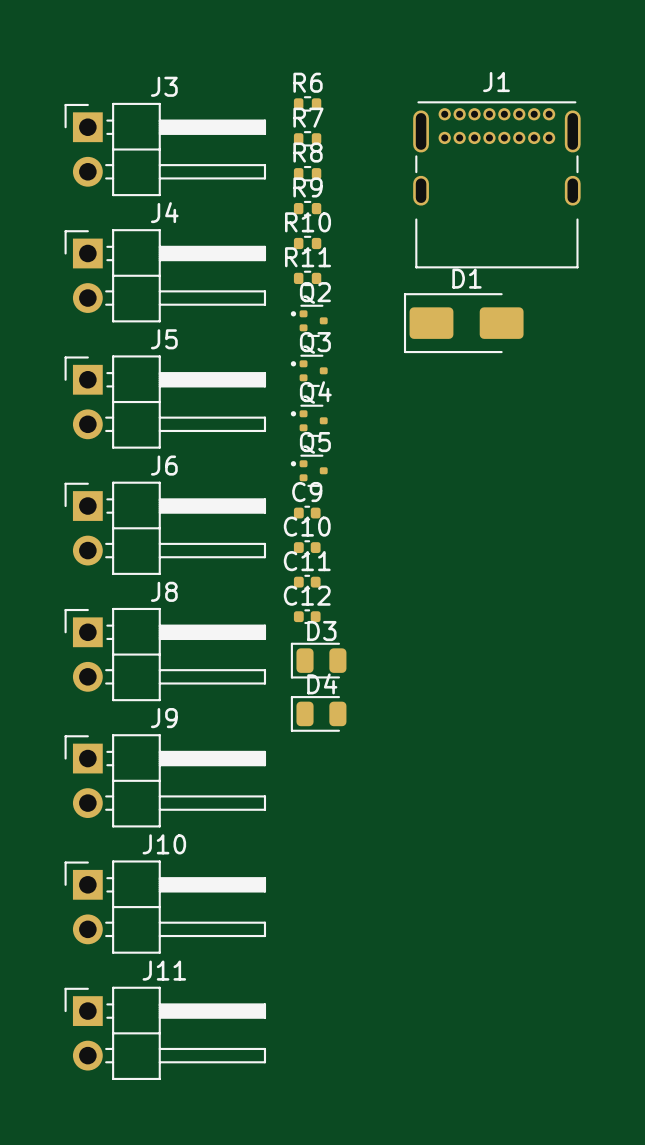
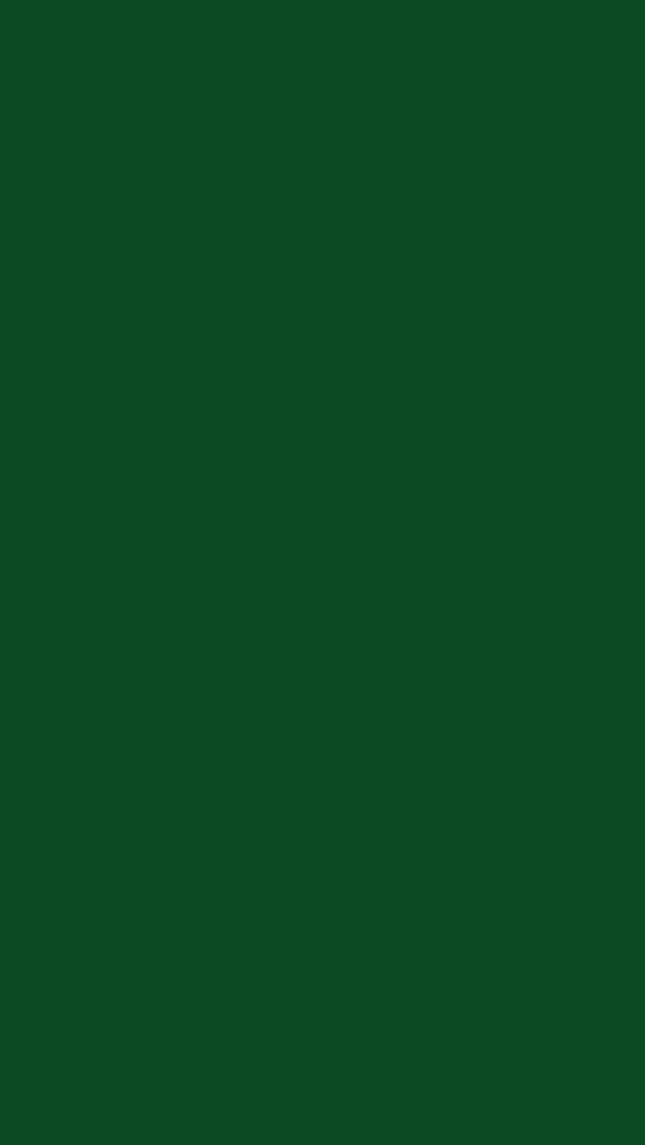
R6: (307, 103) -> none
R7: (307, 138) -> none
J3: (165, 149) -> none
R8: (307, 173) -> none
J1: (496, 184) -> none
R9: (307, 208) -> none
R10: (307, 243) -> none
J4: (165, 275) -> none
R11: (307, 278) -> none
Q2: (309, 320) -> none
D1: (463, 323) -> none
Q3: (309, 370) -> none
J5: (165, 402) -> none
Q4: (309, 420) -> none
Q5: (309, 470) -> none
C9: (307, 513) -> none
J6: (165, 528) -> none
C10: (307, 547) -> none
C11: (307, 582) -> none
C12: (307, 616) -> none
J8: (165, 654) -> none
D3: (318, 660) -> none
D4: (318, 713) -> none
J9: (165, 780) -> none
J10: (165, 907) -> none
J11: (165, 1033) -> none

